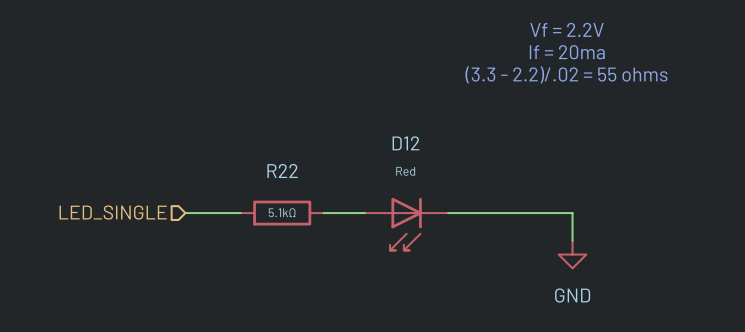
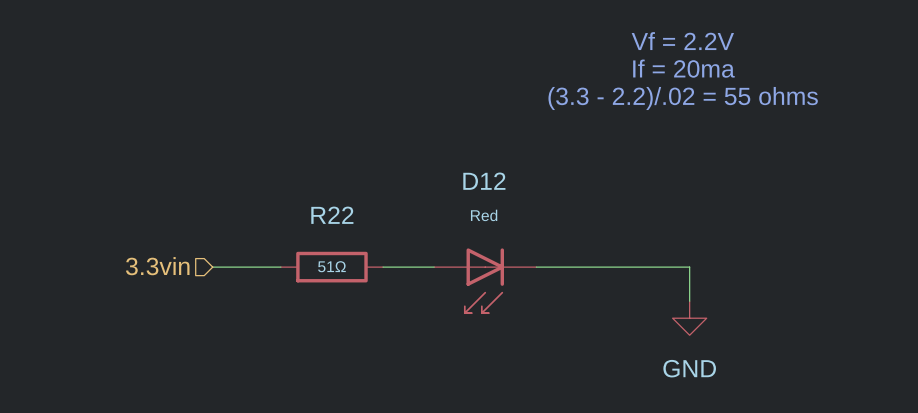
hierarchical label: LED_SINGLE (113, 212) -> 3.3vin (157, 266)
R22 value: 5.1kΩ (282, 212) -> 51Ω (331, 266)

